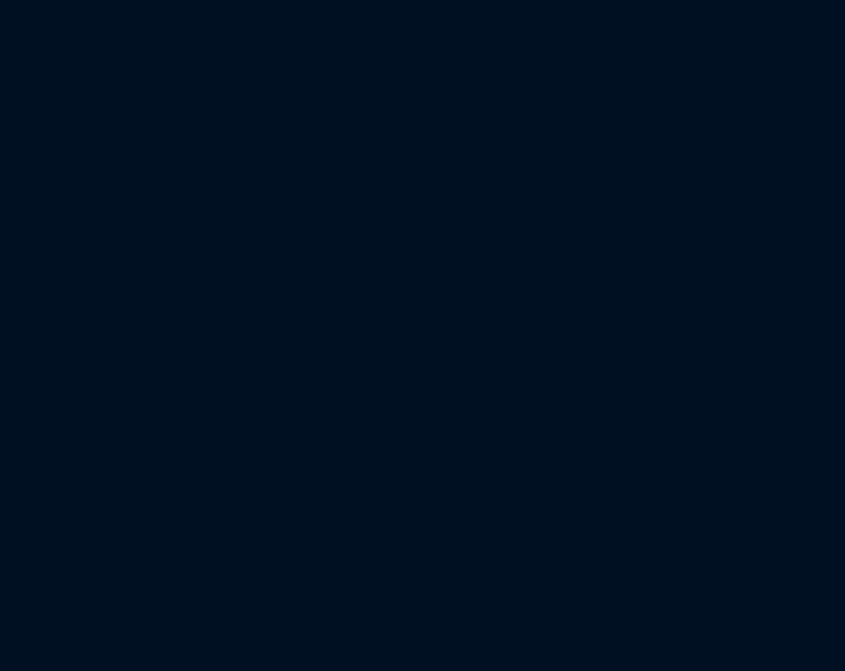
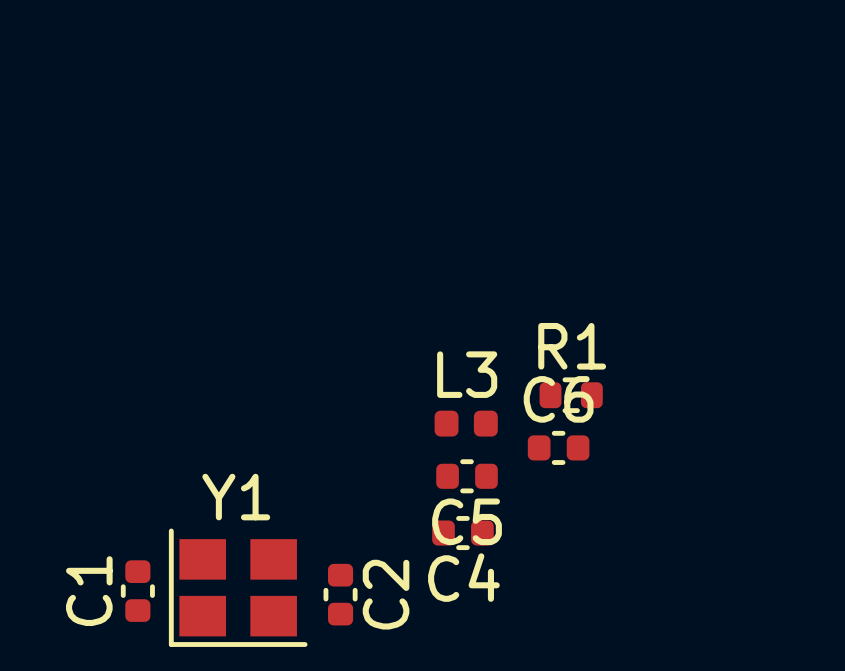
R1: none -> (571, 395)
L3: none -> (466, 423)
C6: none -> (558, 447)
C5: none -> (467, 476)
C4: none -> (462, 533)
Y1: none -> (238, 587)
C1: none -> (137, 591)
C2: none -> (340, 594)

